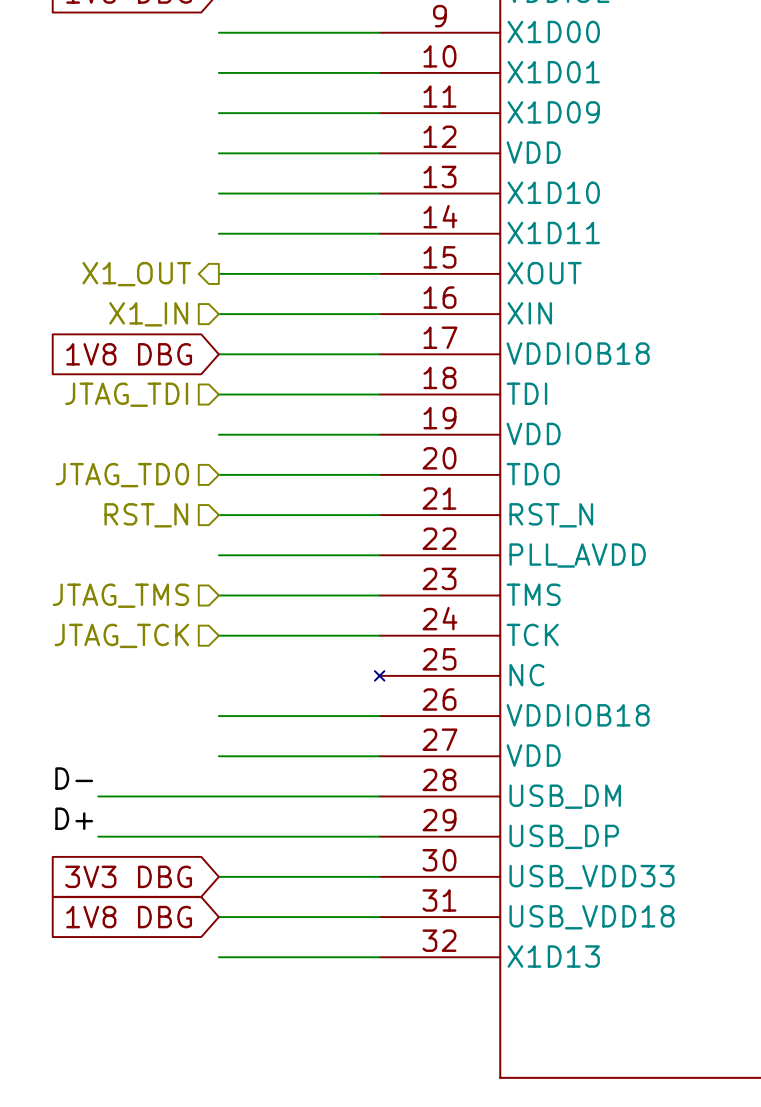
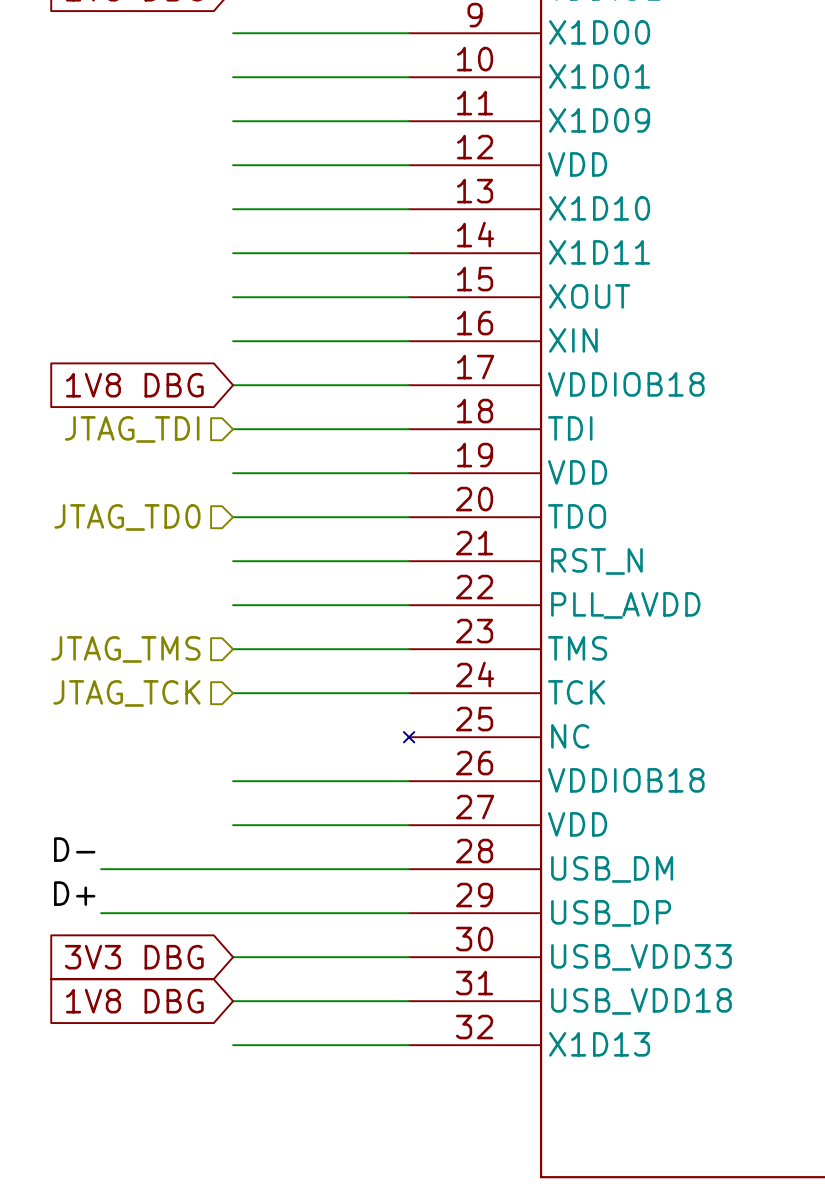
hierarchical label: X1_OUT (136, 274) -> none
hierarchical label: X1_IN (148, 314) -> none
hierarchical label: RST_N (146, 515) -> none

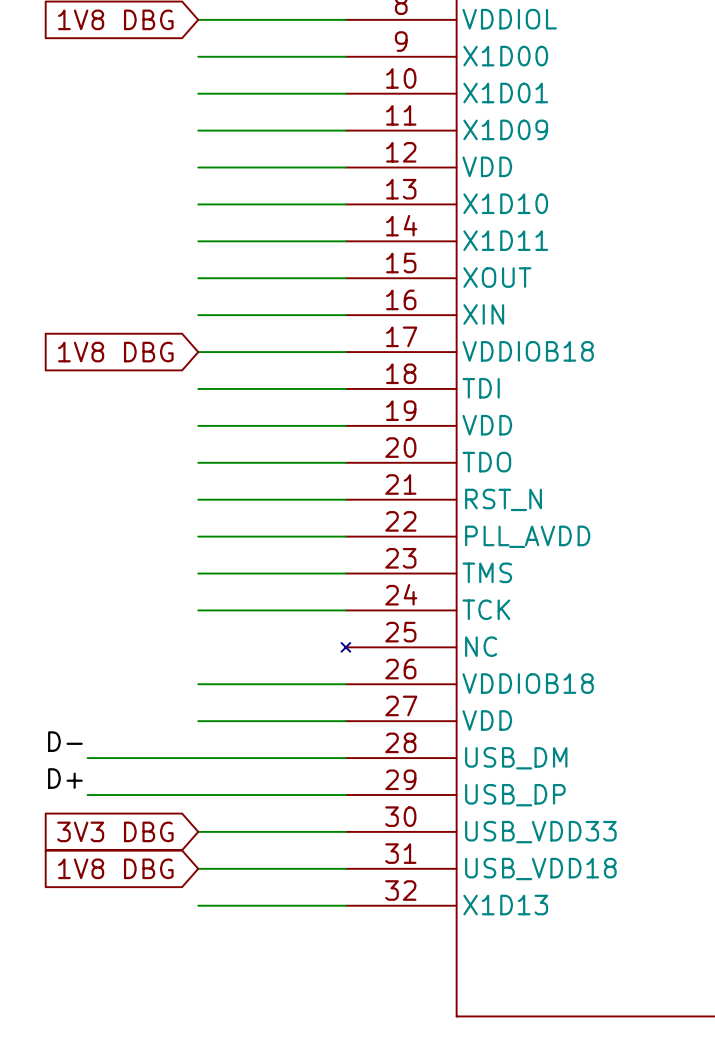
hierarchical label: JTAG_TDI (132, 429) -> none
hierarchical label: JTAG_TD0 (127, 517) -> none
hierarchical label: JTAG_TMS (125, 649) -> none
hierarchical label: JTAG_TCK (126, 693) -> none

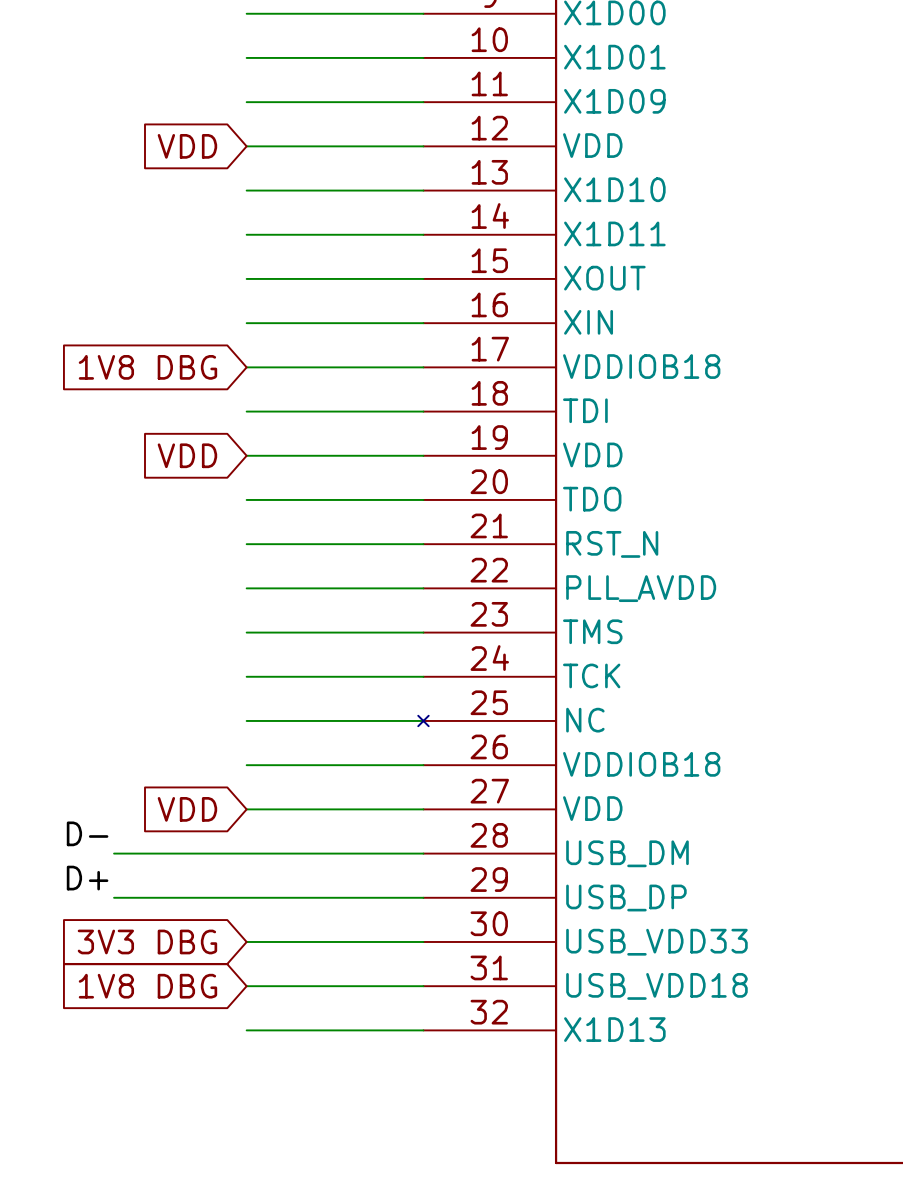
global label: none -> VDD (187, 146)
global label: none -> VDD (187, 455)
wire: none -> (246, 720) (423, 720)
global label: none -> VDD (187, 809)

